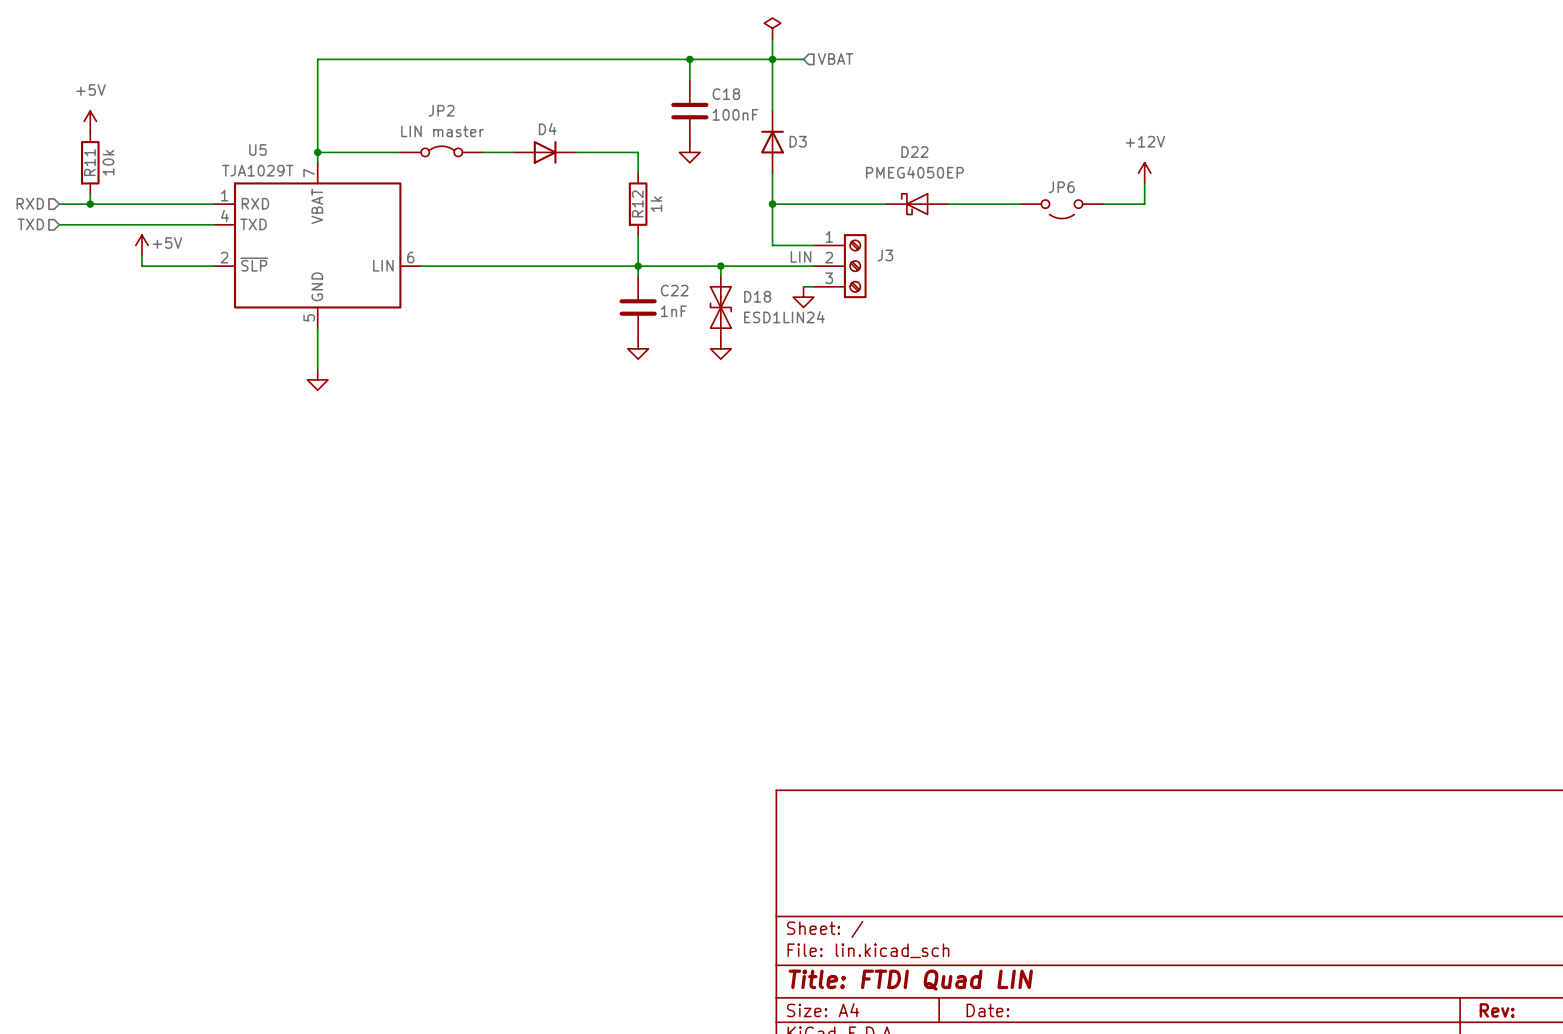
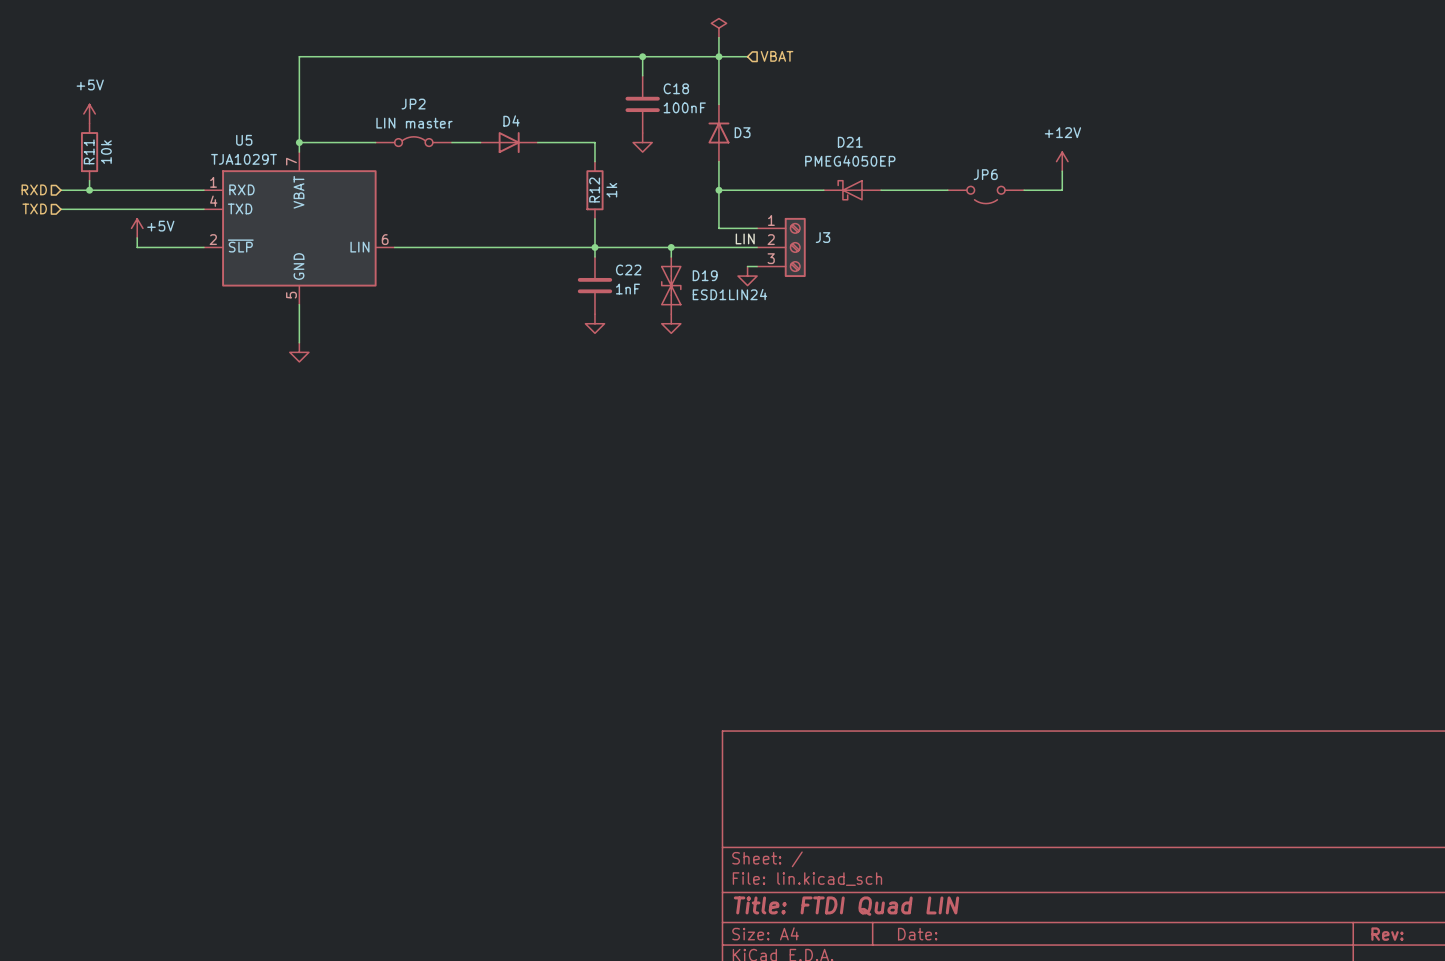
D22 name: D22 (914, 152) -> D21 (850, 142)
D18 name: D18 (757, 296) -> D19 (705, 275)

